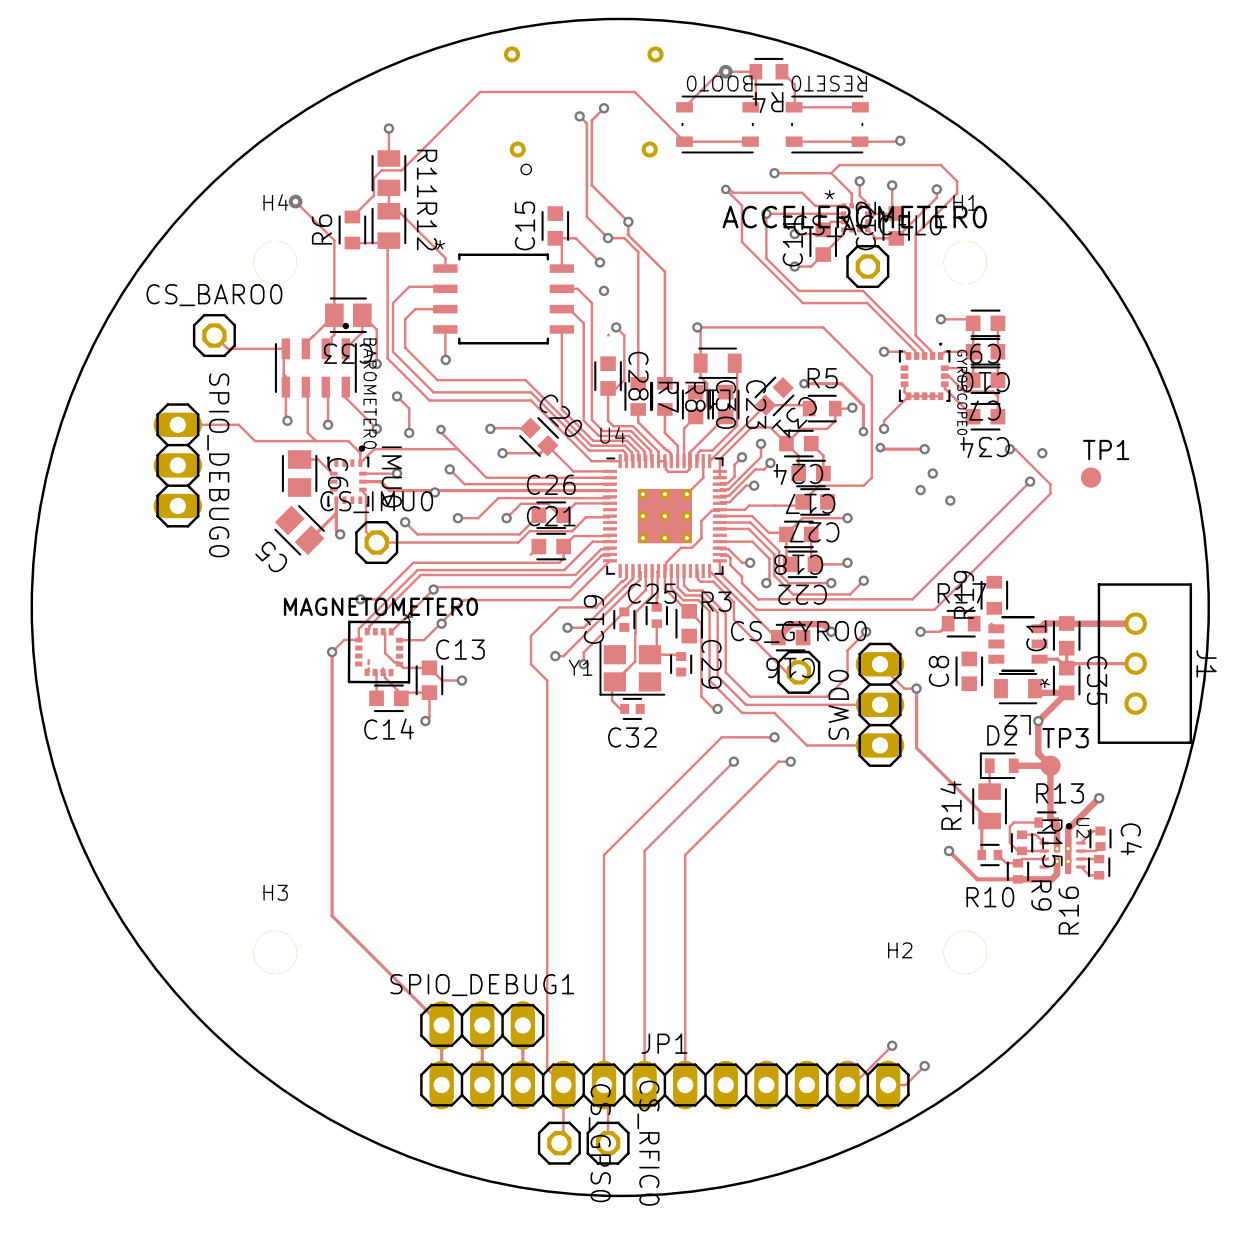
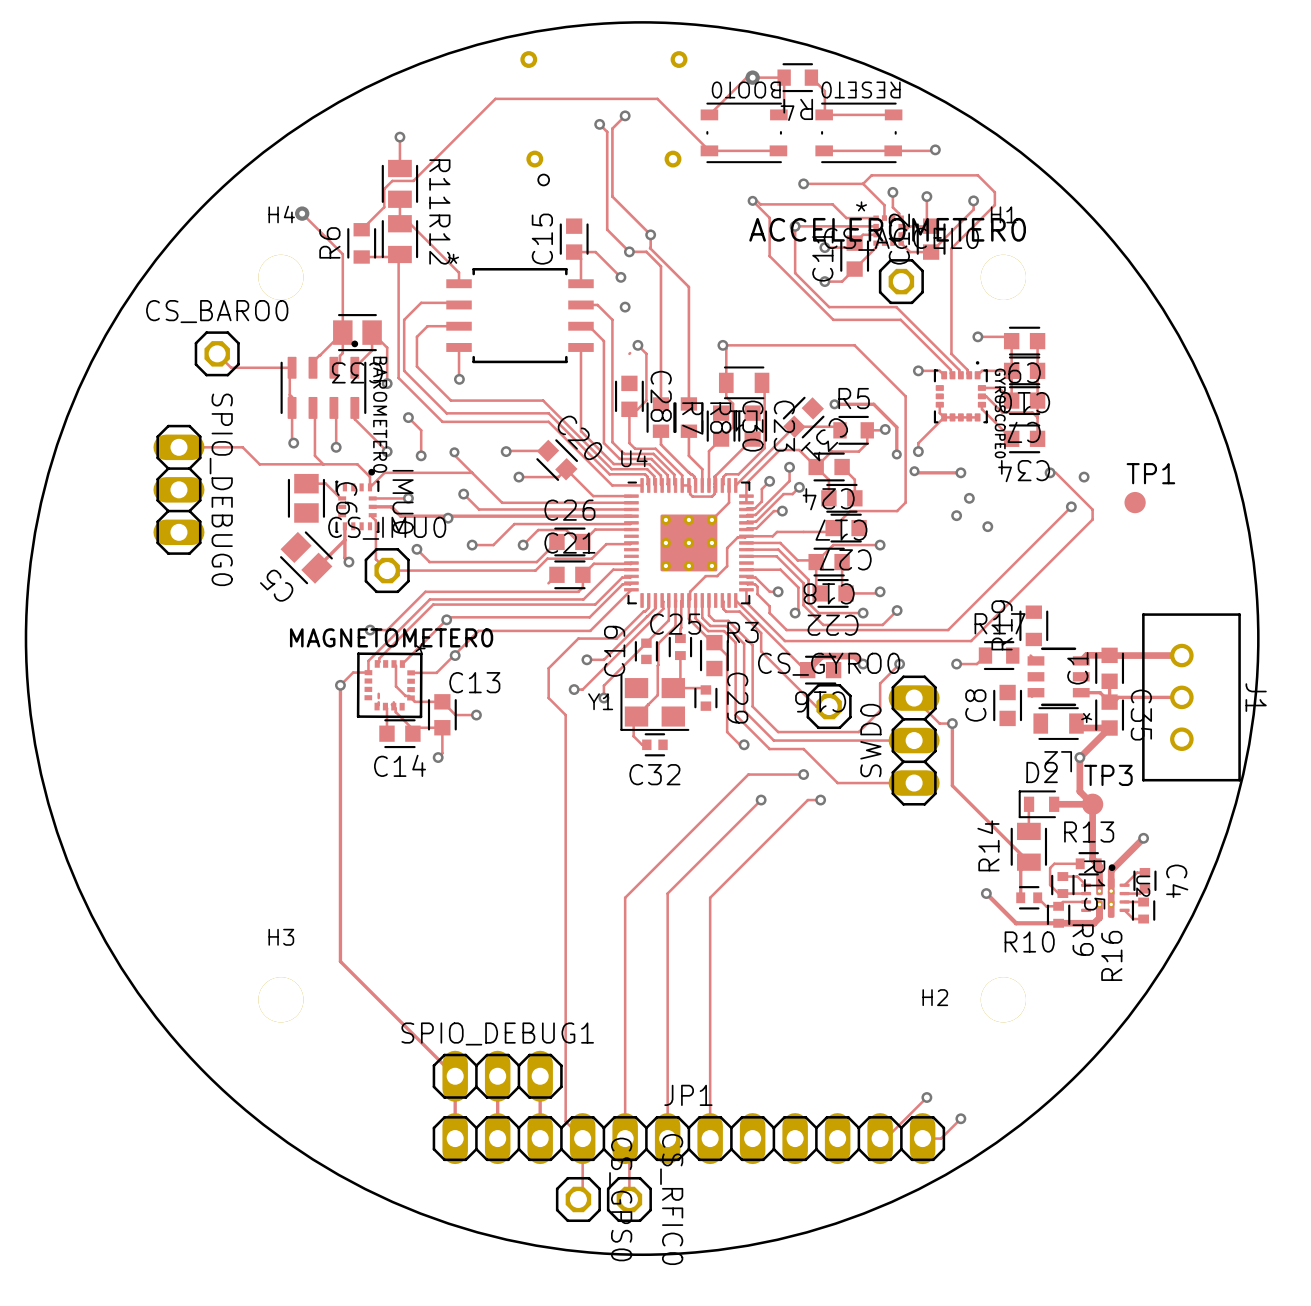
R13 name position: R13 (1060, 793) -> R13 (1089, 831)
U2 name position: U2 (1083, 828) -> U2 (1143, 886)

